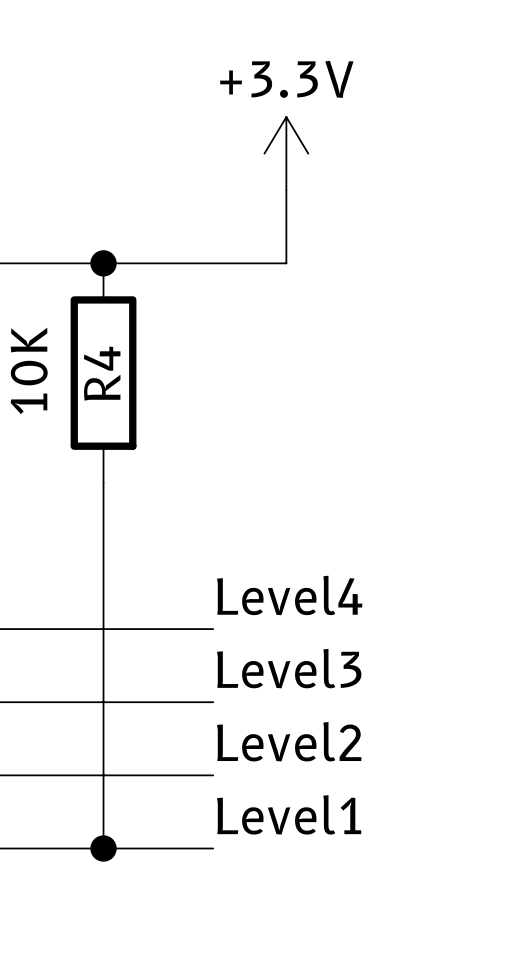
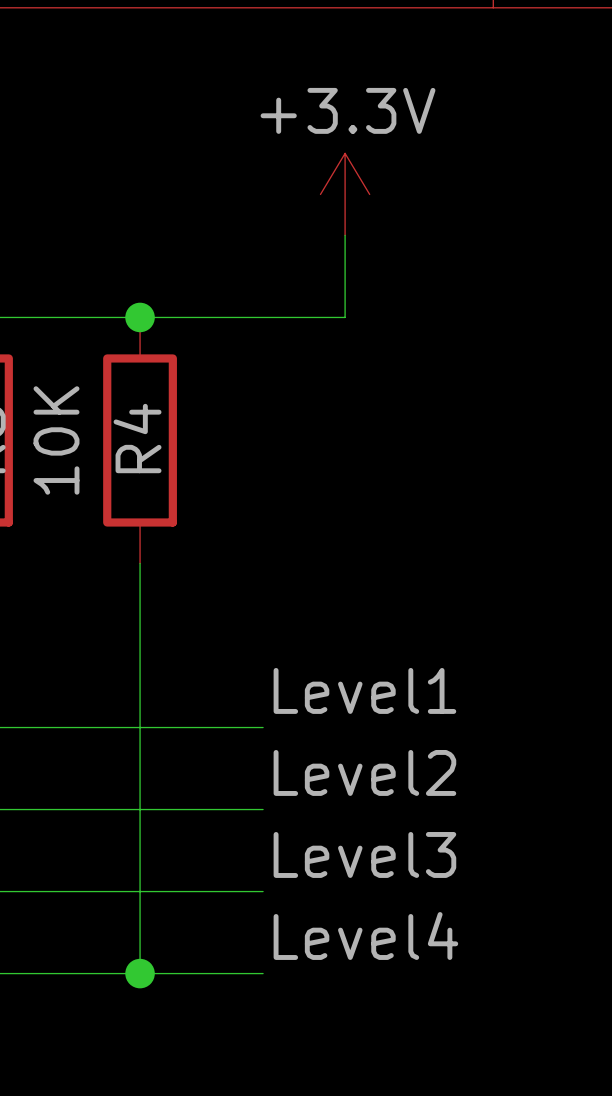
label: Level4 (289, 595) -> Level1 (364, 690)
label: Level3 (289, 668) -> Level2 (364, 772)
label: Level2 (289, 741) -> Level3 (364, 854)
label: Level1 (289, 814) -> Level4 (365, 936)

